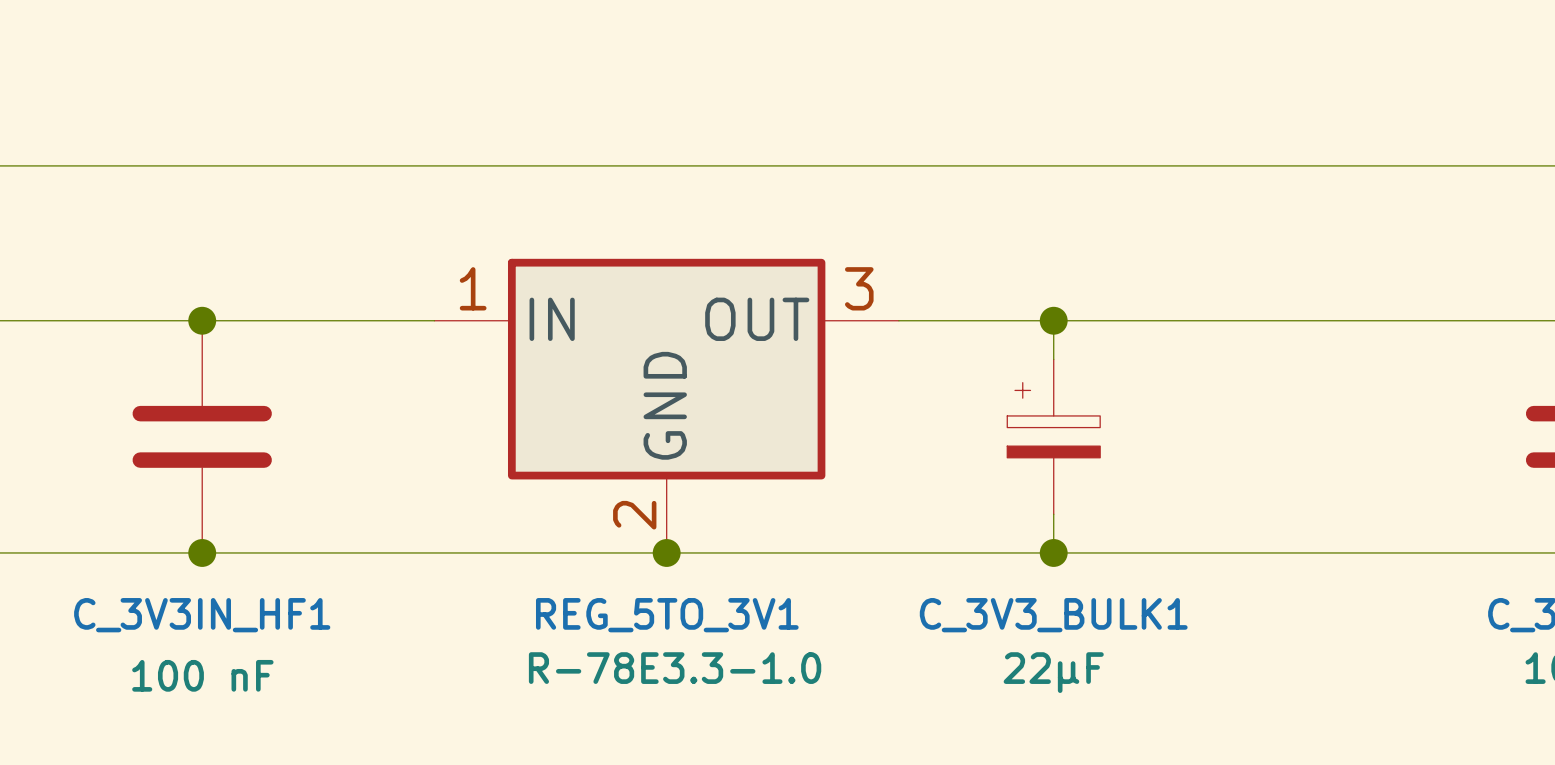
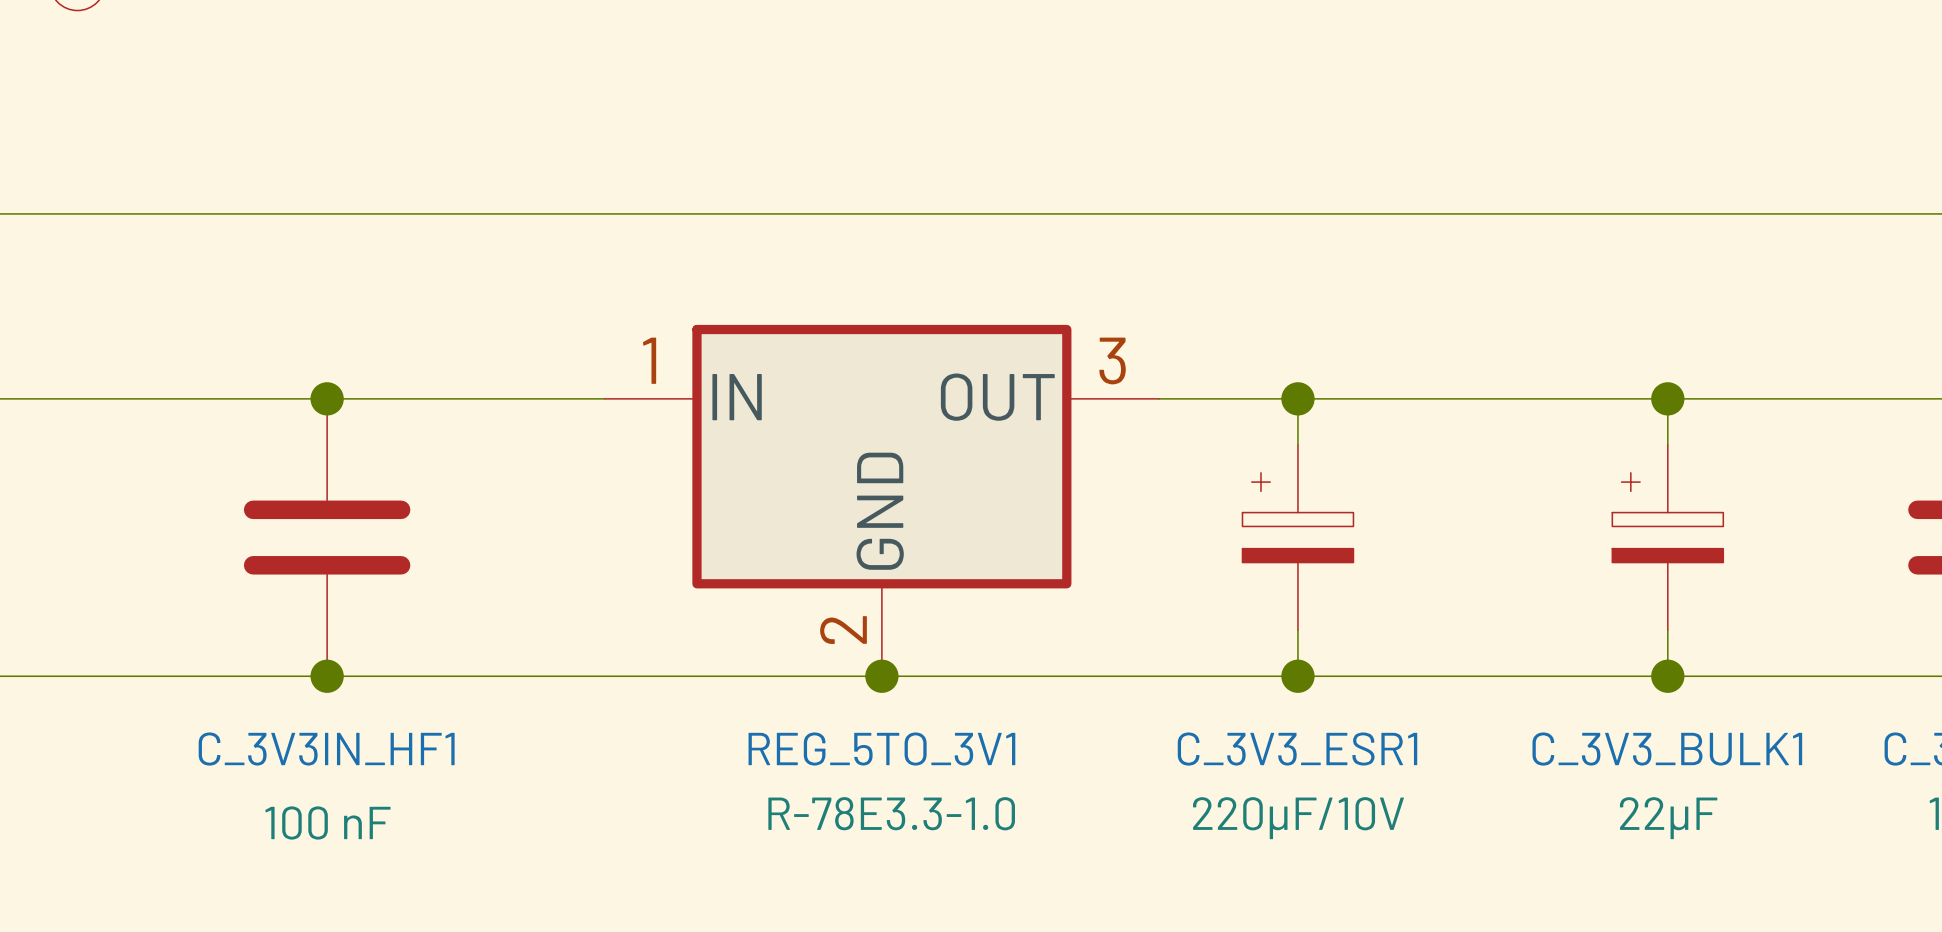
wire: (1053, 320) (1053, 359) -> (1297, 398) (1297, 445)
junction position: (1053, 320) -> (1297, 398)
wire: none -> (1667, 398) (1667, 445)
junction: none -> (1667, 398)
C_3V3_ESR1: none -> 220µF/10V (1297, 537)
C_3V3_BULK1 position: (1053, 436) -> (1667, 537)
wire: (1053, 514) (1053, 552) -> (1297, 630) (1297, 676)
wire: none -> (1667, 630) (1667, 676)
junction position: (1053, 552) -> (1297, 676)
junction: none -> (1667, 676)

